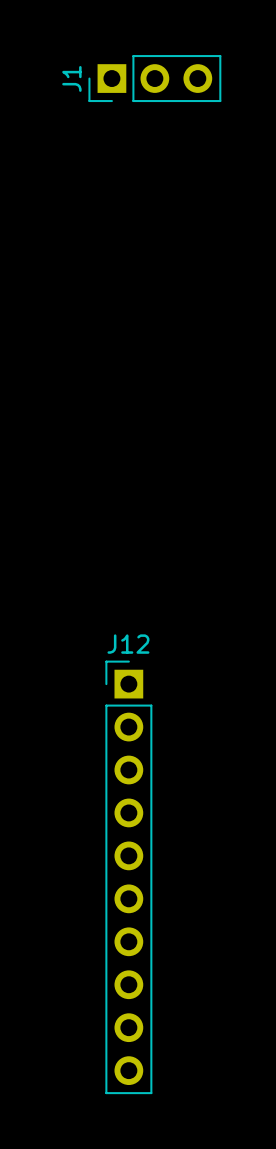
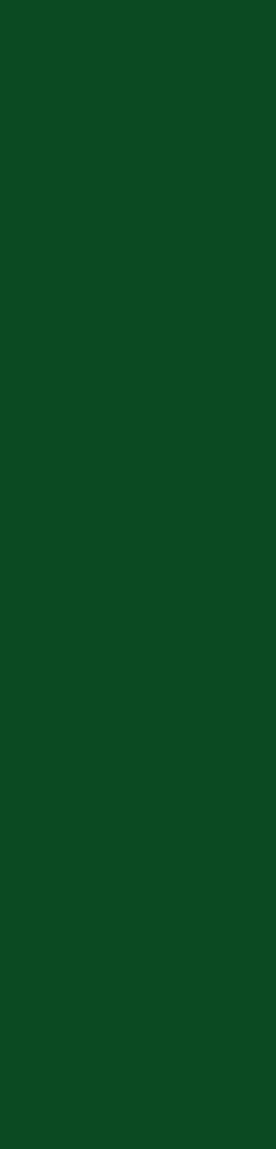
J1: (154, 78) -> none
J12: (128, 877) -> none

